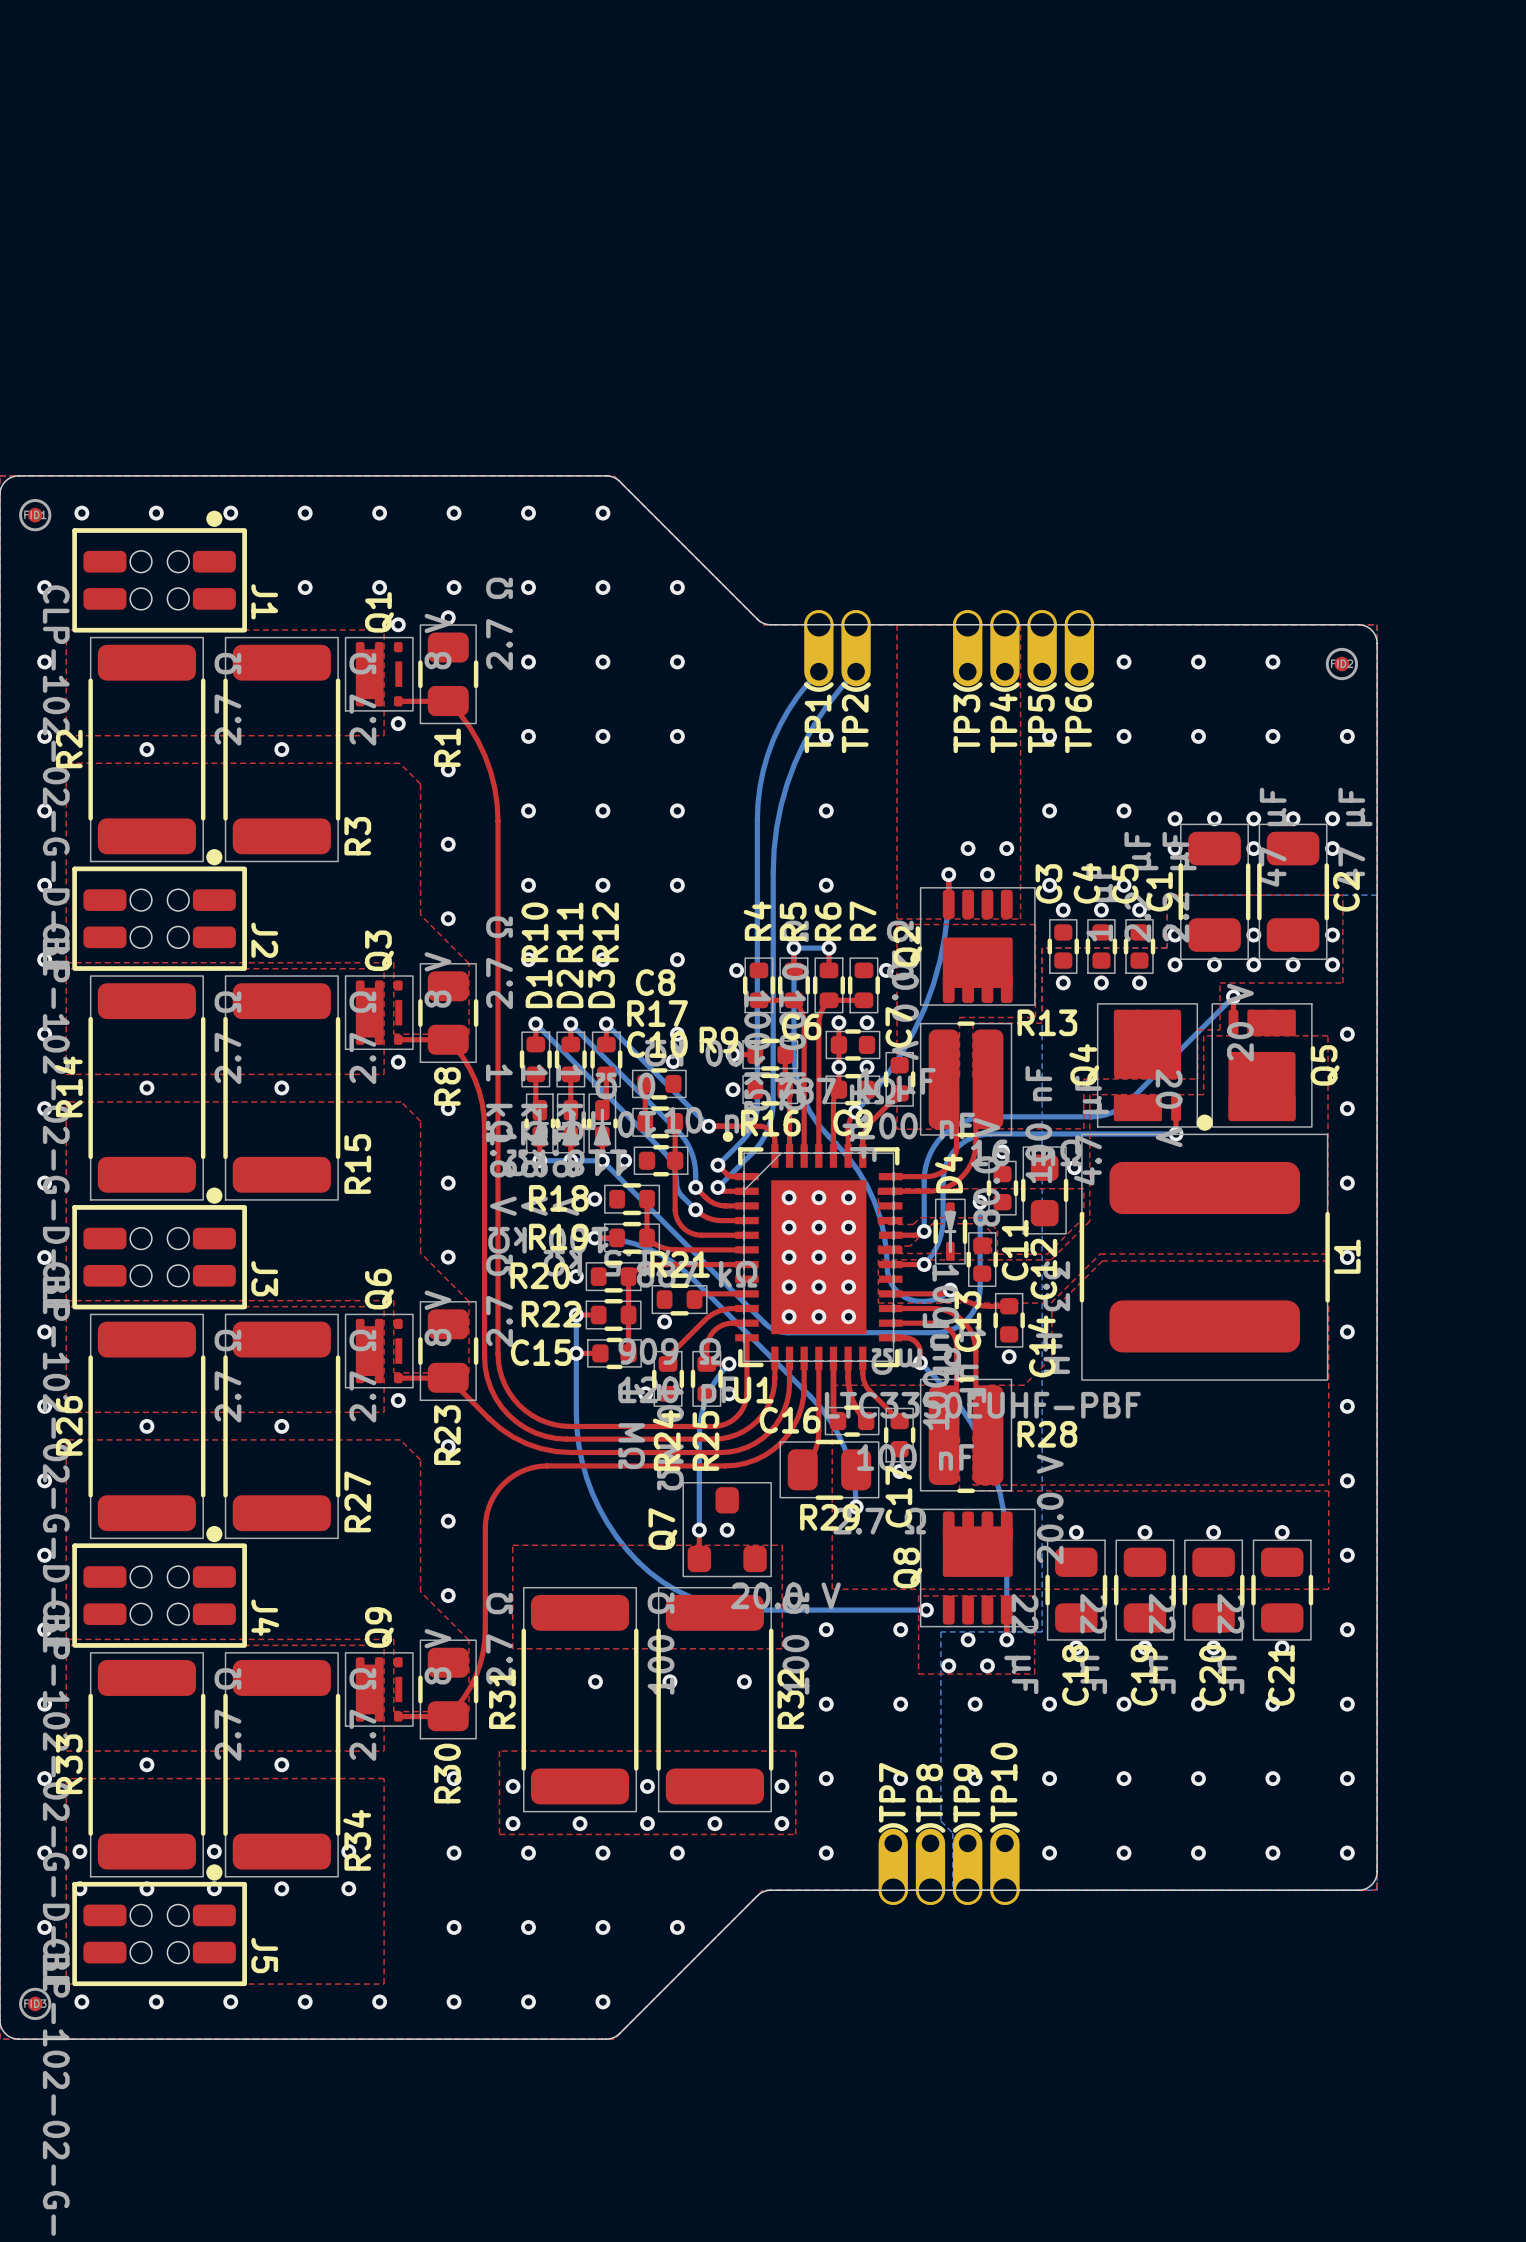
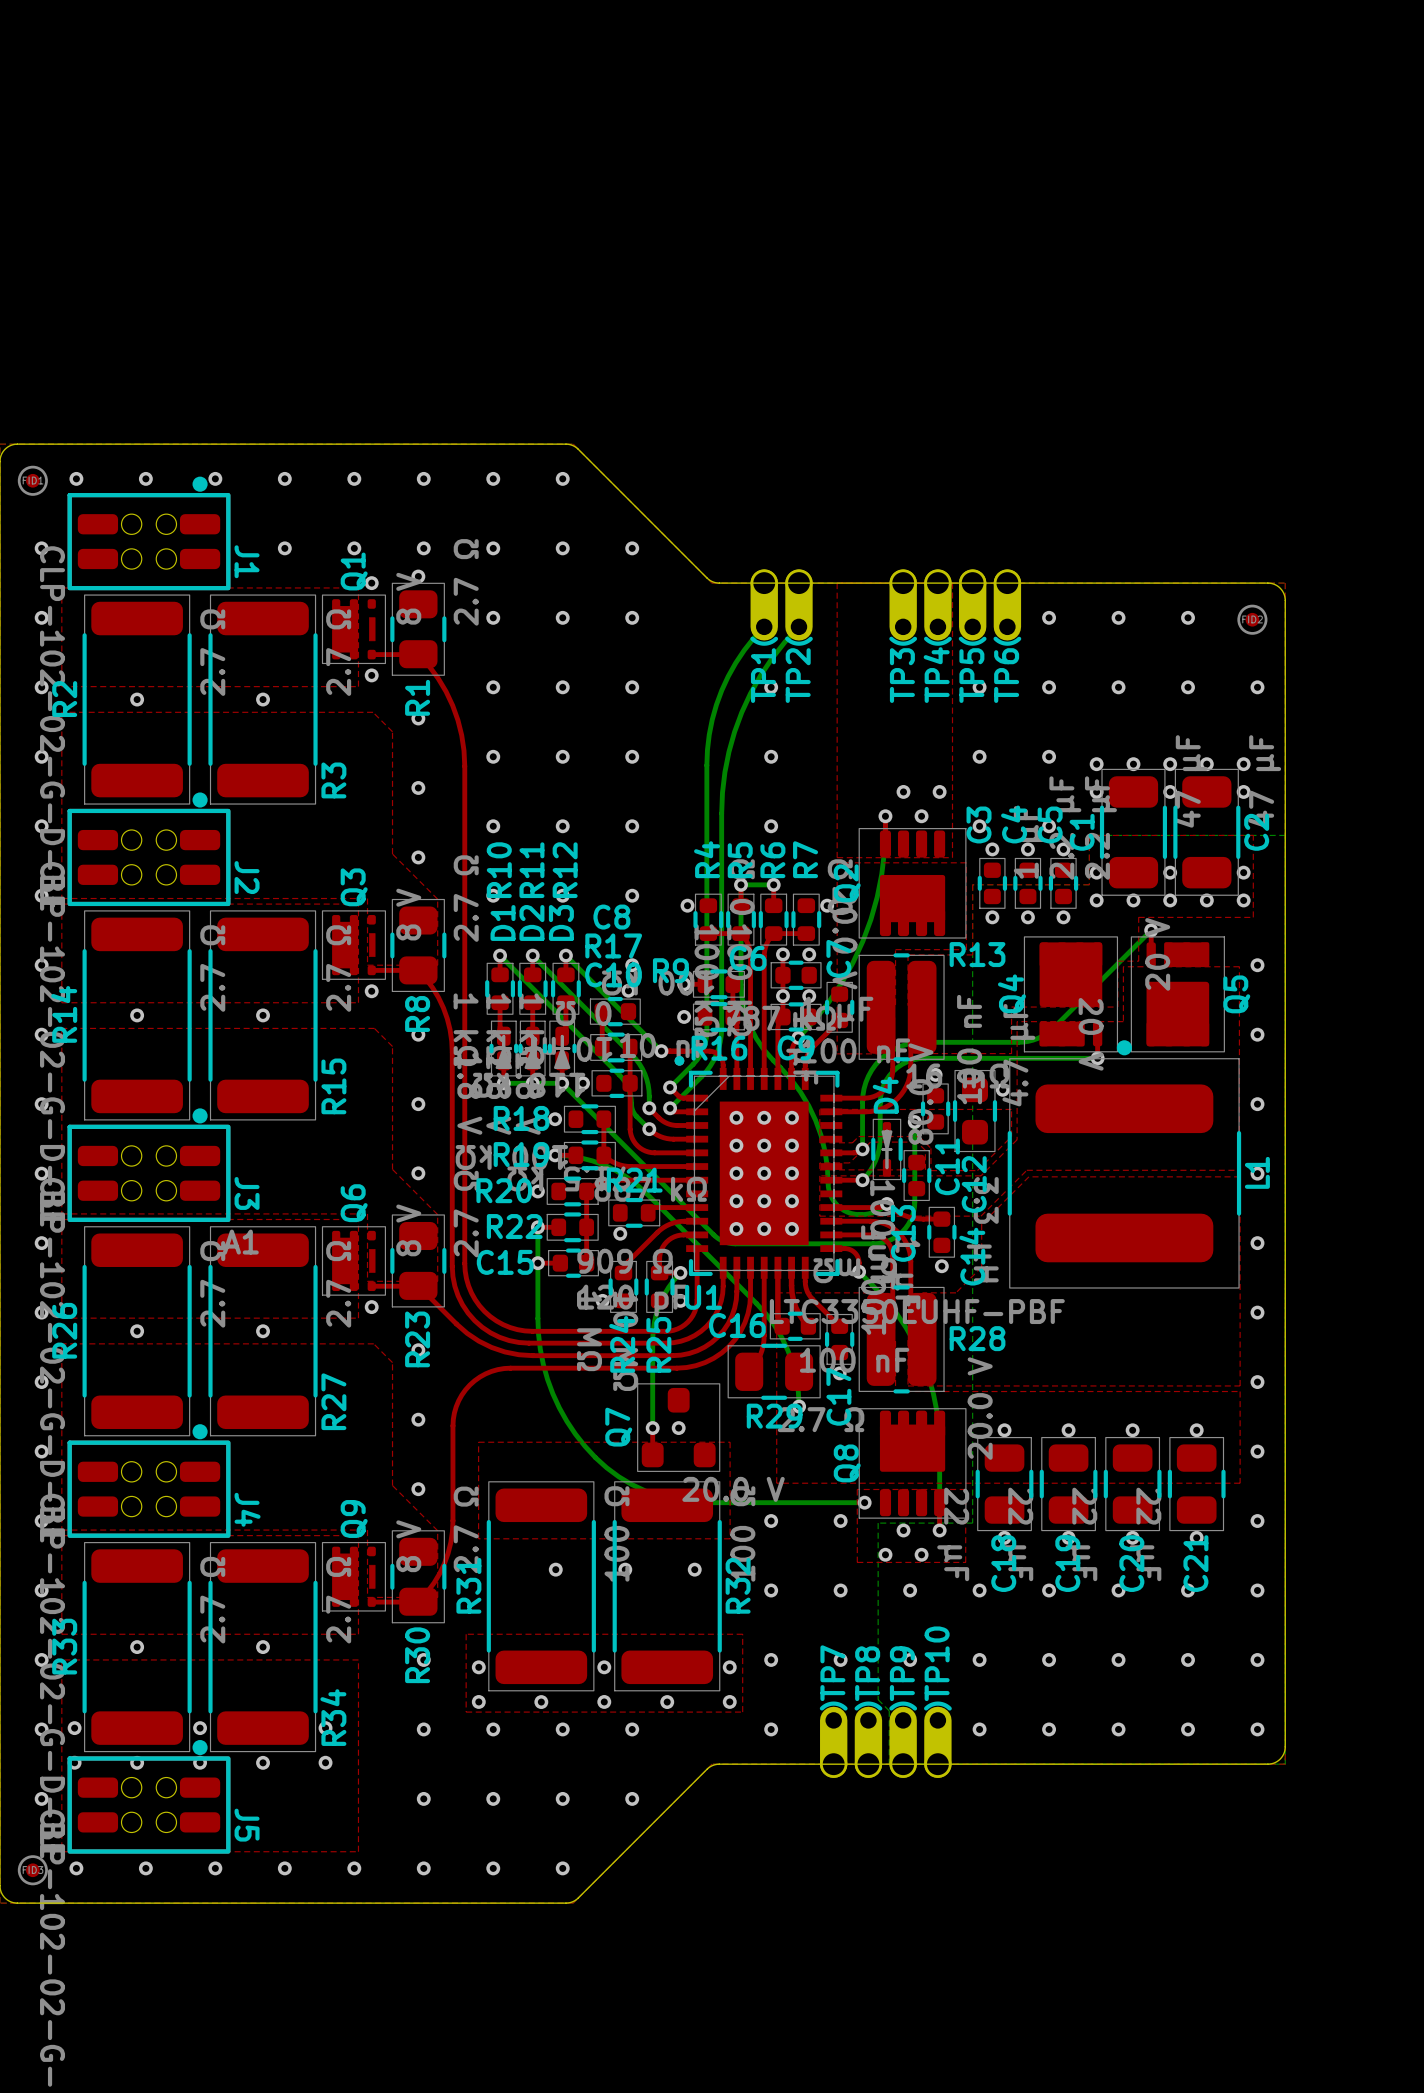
A1: none -> (240, 1242)

